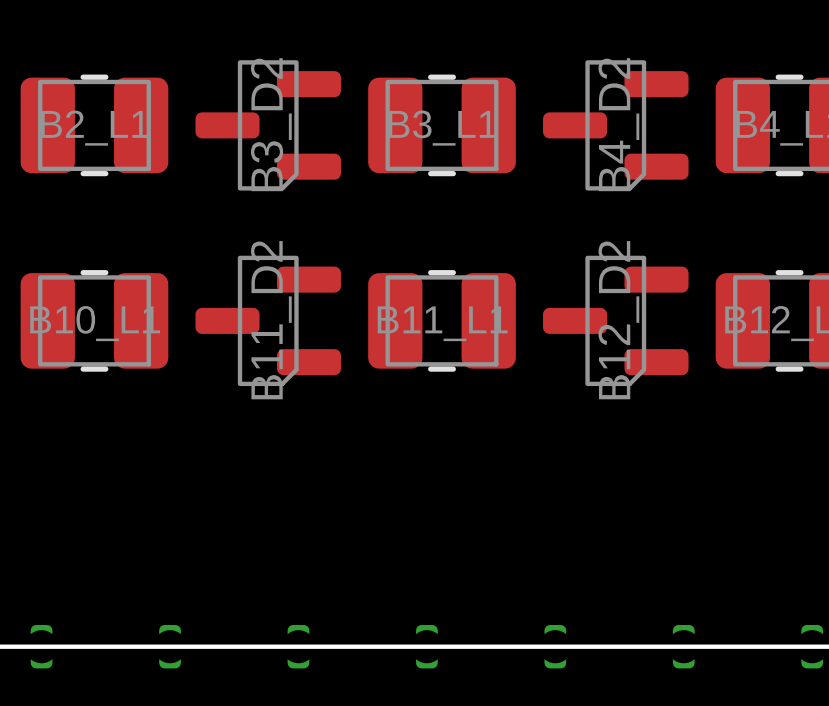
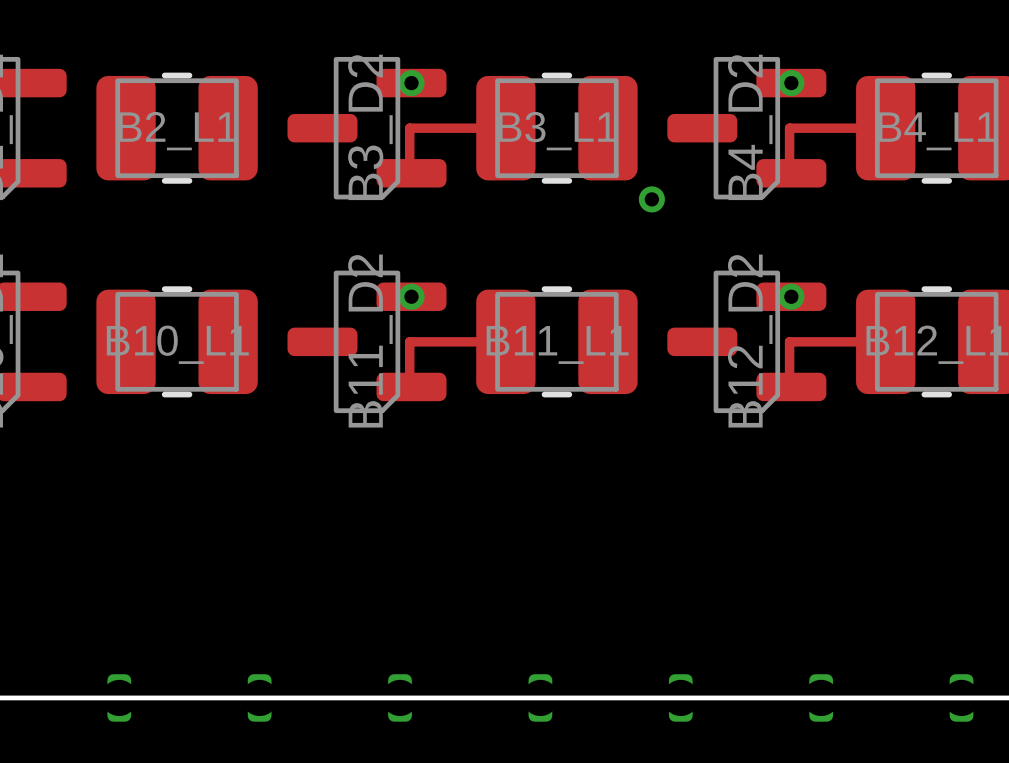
via: none -> (411, 83)
via: none -> (791, 83)
track: none -> (504, 128) (409, 128) (409, 175)
track: none -> (884, 128) (789, 128) (789, 175)
via: none -> (651, 199)
via: none -> (411, 296)
via: none -> (791, 296)
track: none -> (504, 341) (409, 341) (409, 384)
track: none -> (884, 341) (789, 341) (789, 384)

